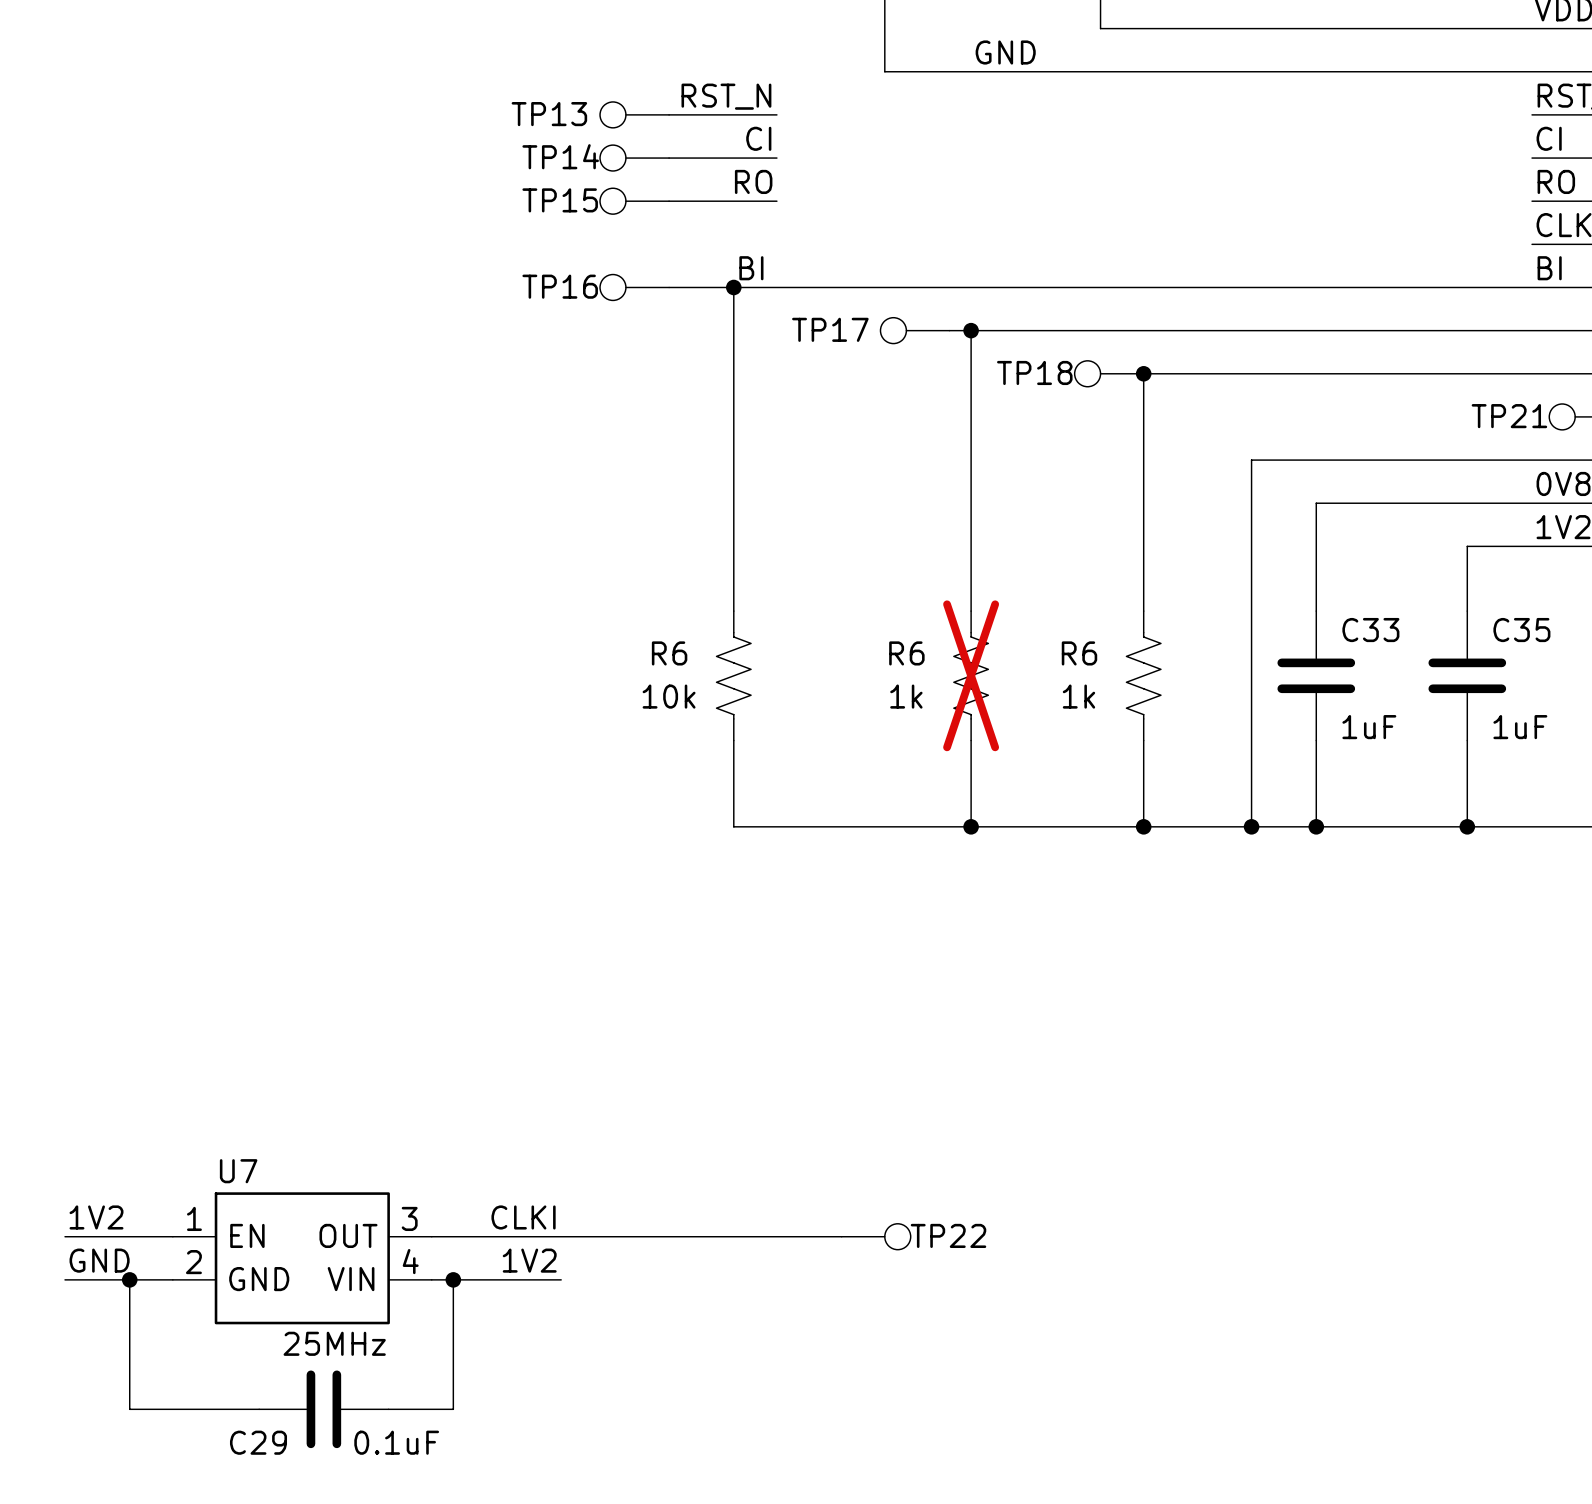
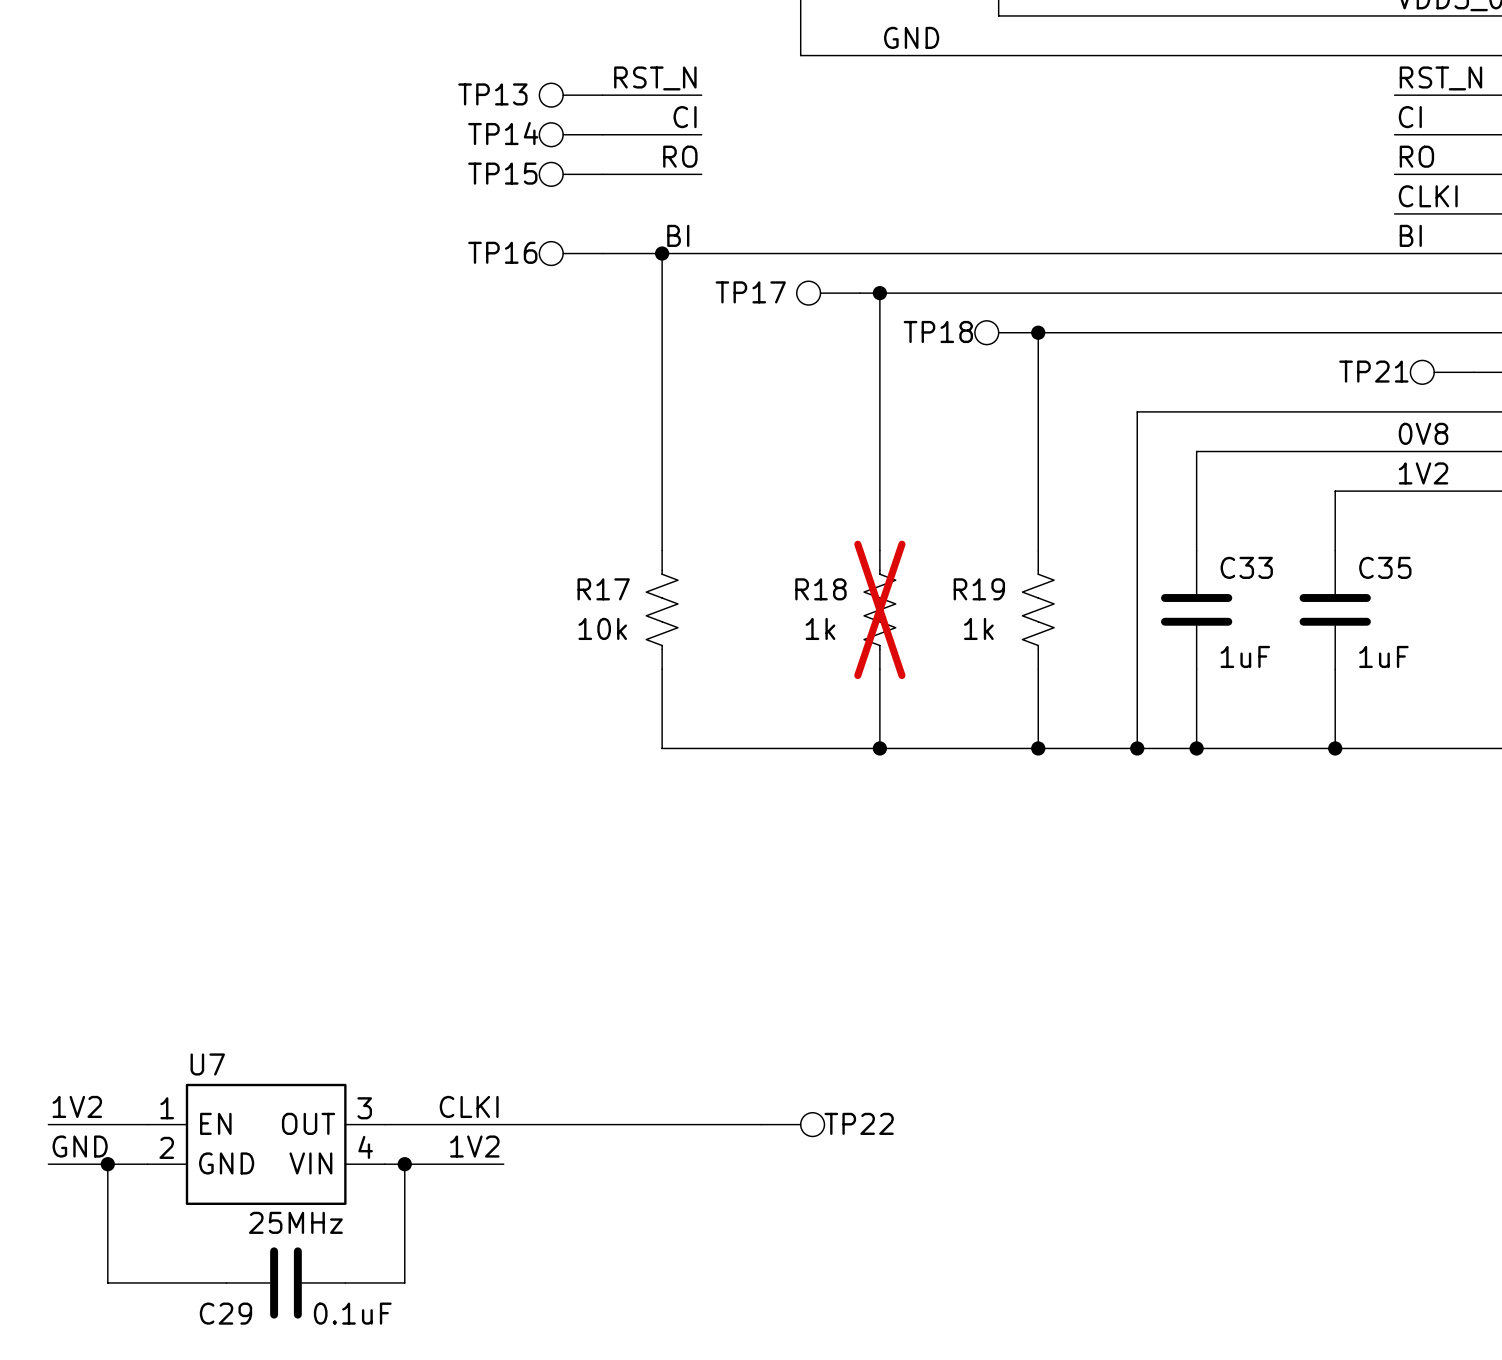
R6 name: R6 (669, 653) -> R17 (603, 589)
R6 name: R6 (906, 653) -> R18 (820, 589)
R6 name: R6 (1079, 653) -> R19 (979, 589)

